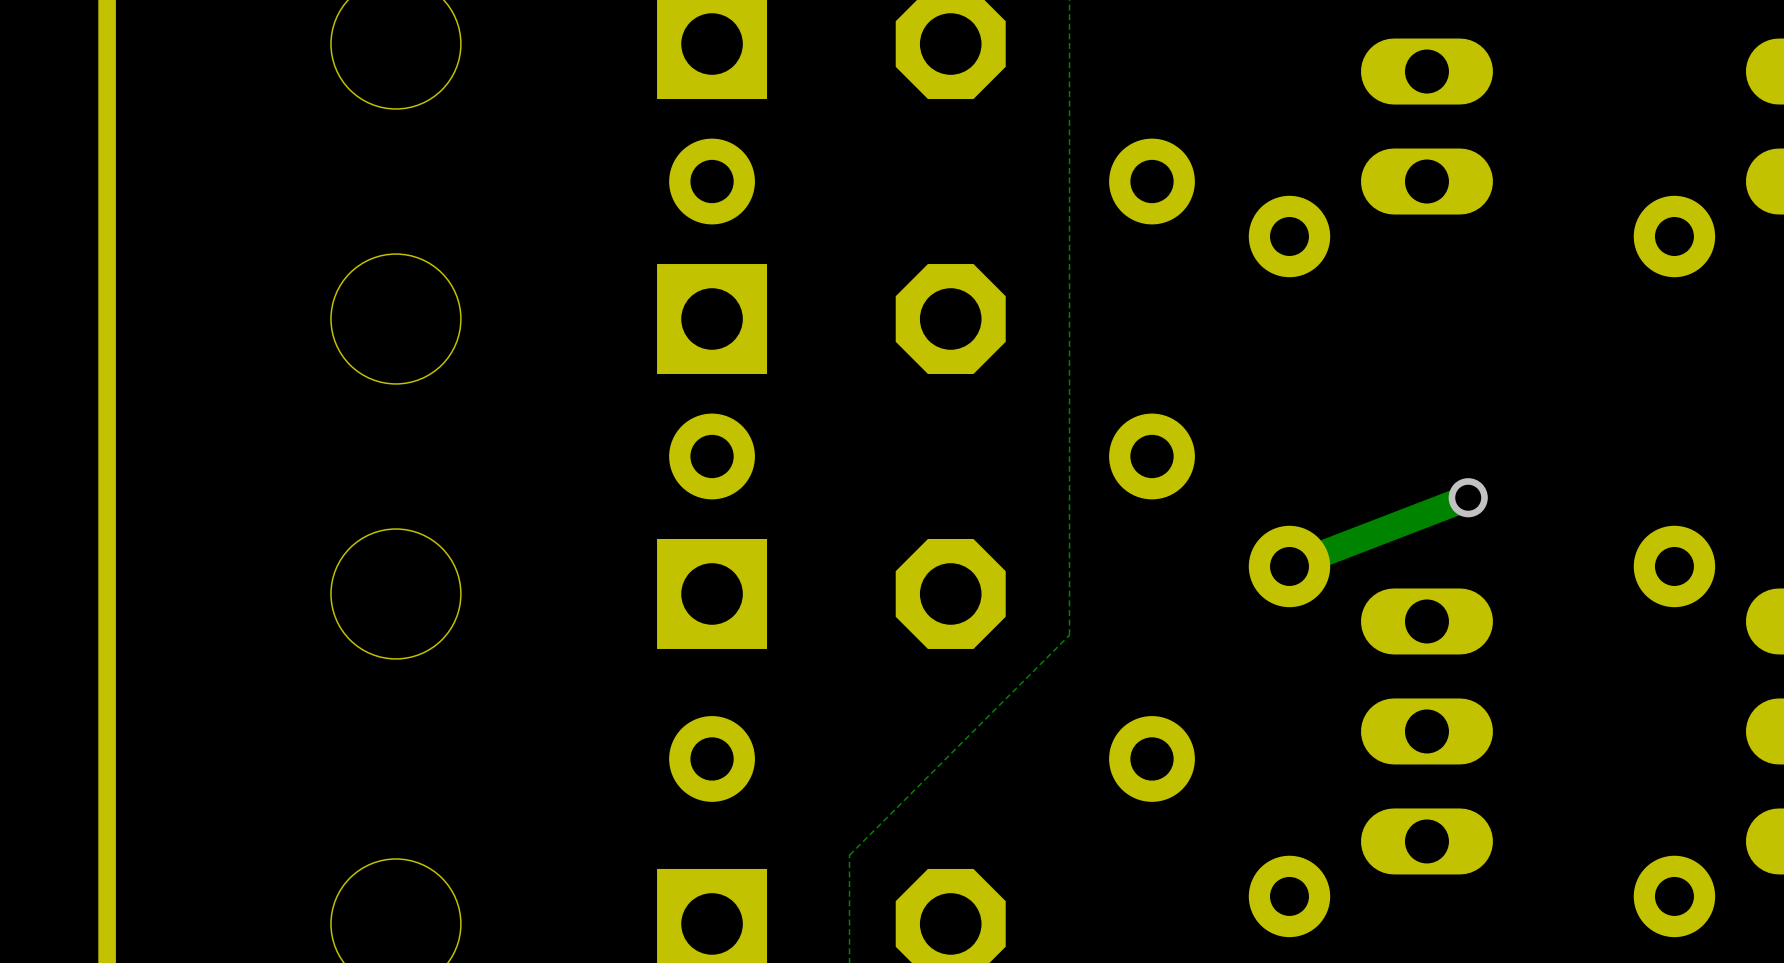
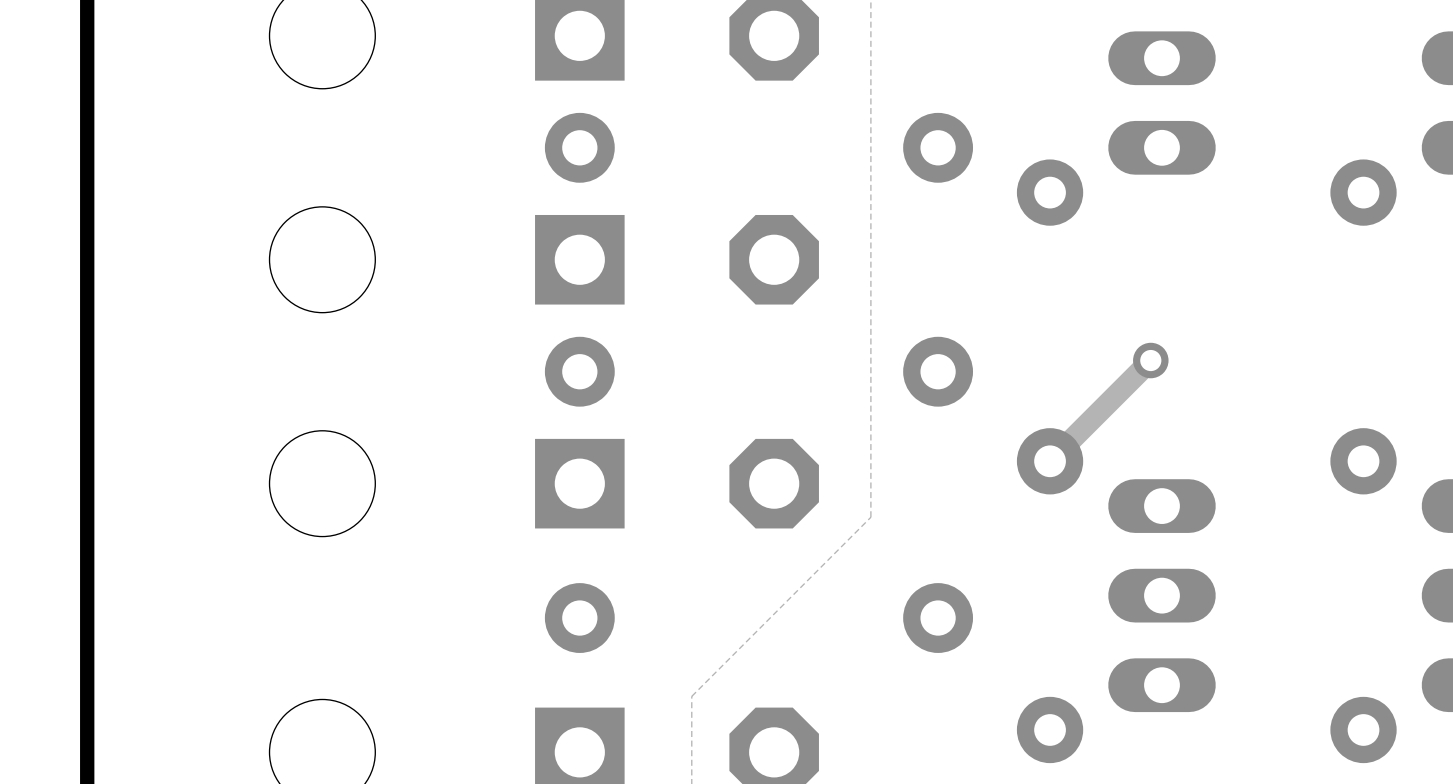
via: none -> (1150, 360)
track: (1468, 497) (1289, 566) -> (1150, 360) (1050, 461)
via: (1468, 497) -> none

